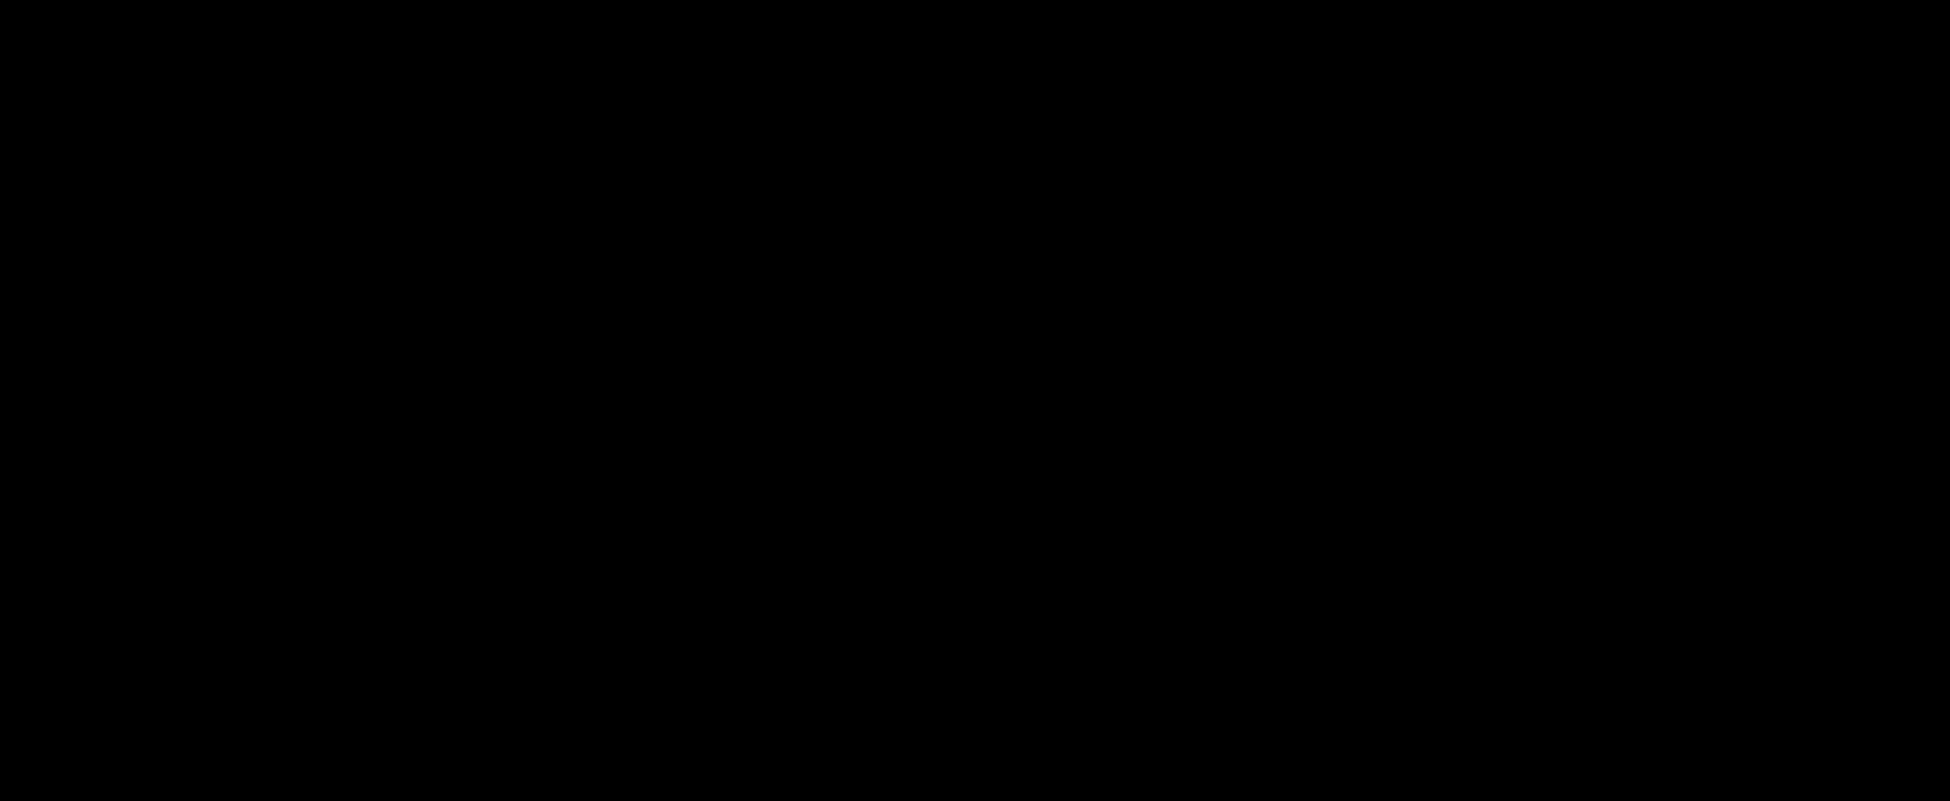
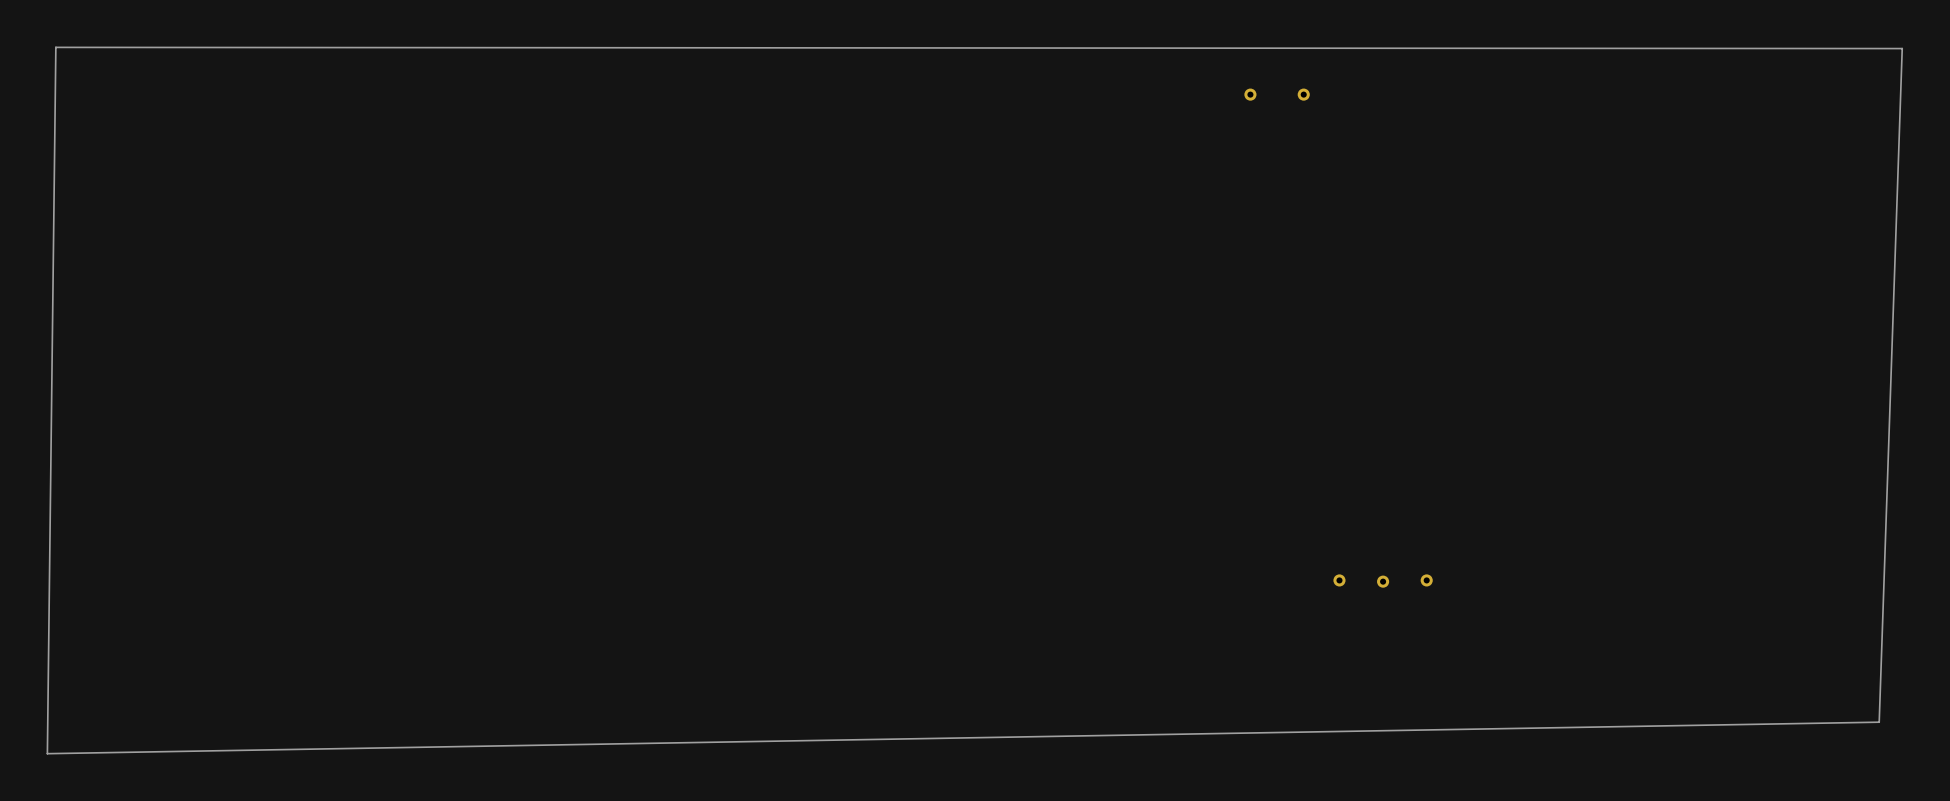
board edge: none -> (55, 47) (1902, 48) (1879, 722) (47, 753) (55, 47)
part: none -> (1250, 94)
part: none -> (1303, 94)
part: none -> (1339, 580)
part: none -> (1426, 580)
part: none -> (1383, 581)

